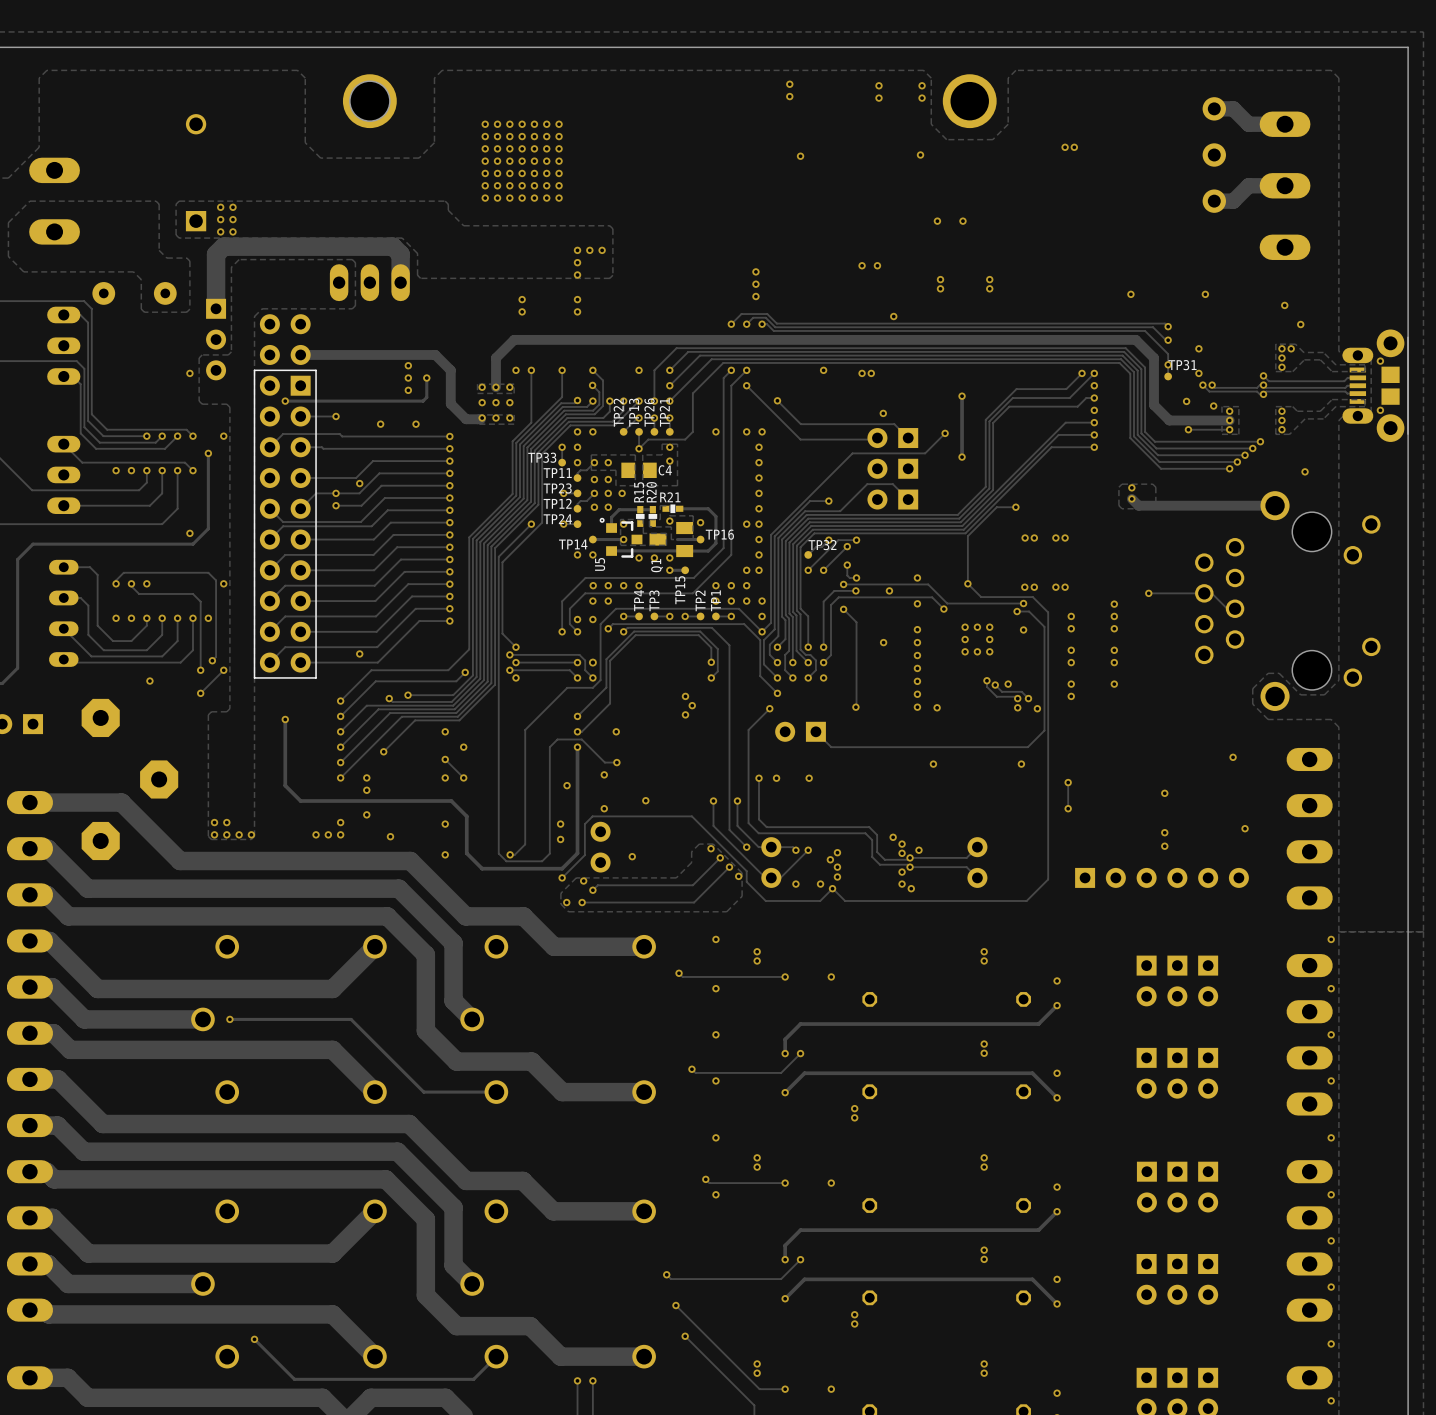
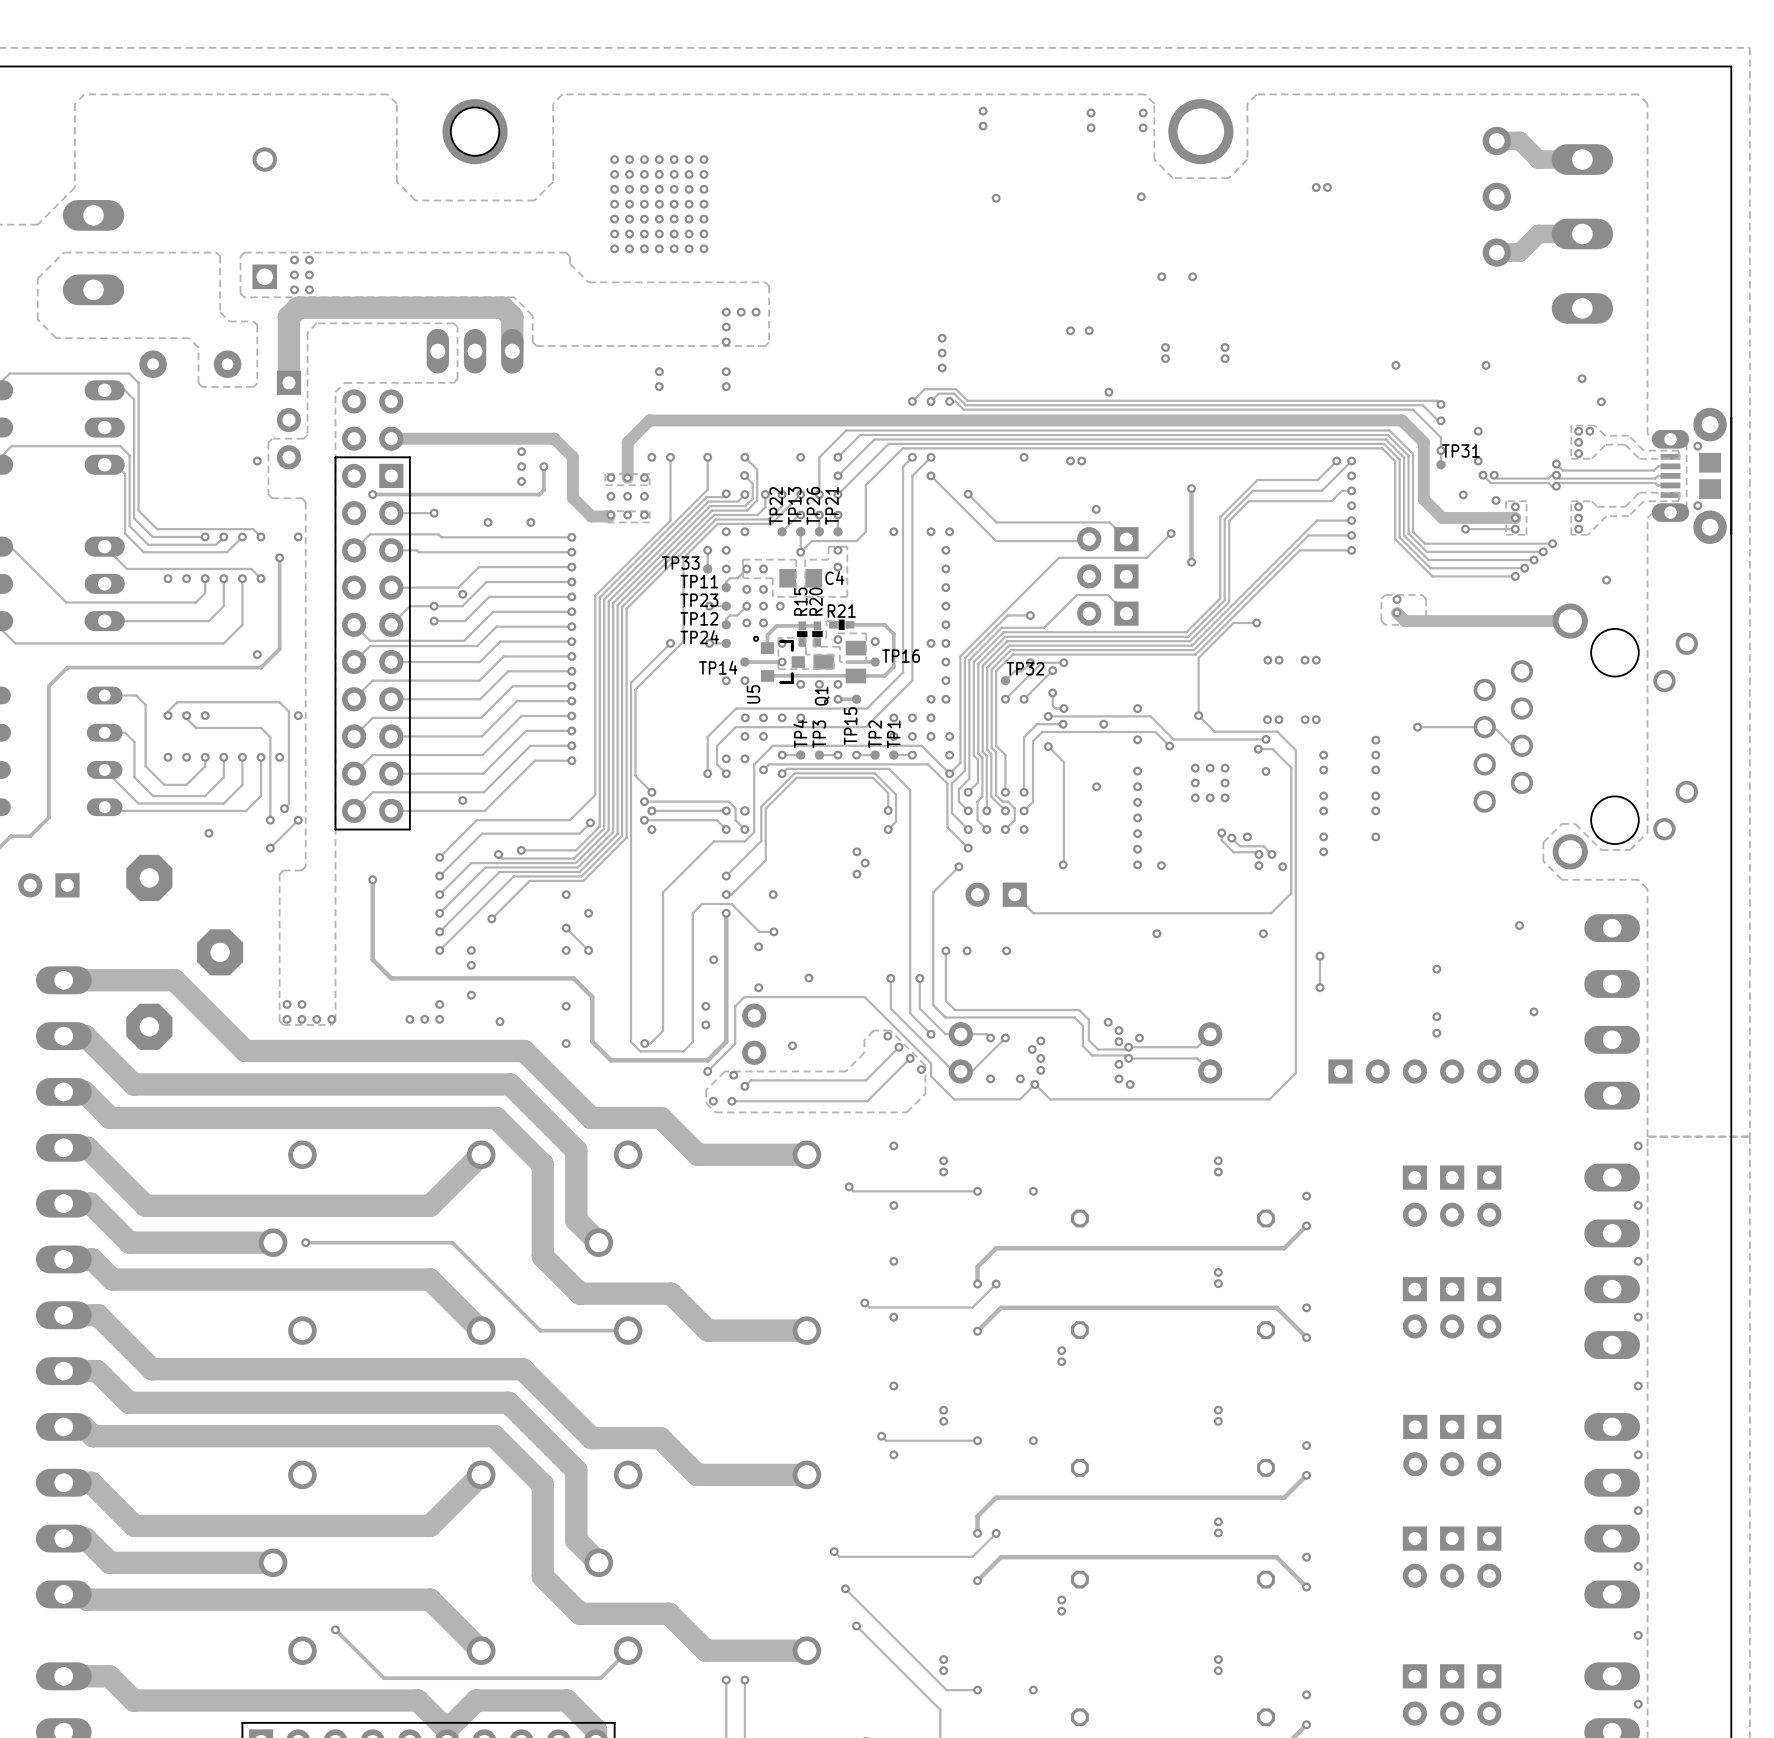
track: (512, 441) (512, 494) (469, 537) -> (647, 543) (595, 595) (595, 659)
track: (516, 442) (516, 495) (472, 538) -> (652, 545) (599, 597) (599, 661)
track: (519, 444) (519, 497) (476, 540) -> (656, 547) (604, 599) (604, 663)
track: (523, 446) (523, 498) (480, 541) -> (661, 548) (608, 601) (608, 665)
track: (527, 447) (527, 500) (484, 543) -> (665, 550) (613, 603) (613, 666)
track: (531, 449) (531, 501) (487, 545) -> (670, 552) (617, 605) (617, 668)
track: (534, 450) (534, 503) (491, 546) -> (674, 554) (622, 606) (622, 670)
track: (538, 452) (538, 504) (495, 548) -> (679, 556) (626, 608) (626, 672)

